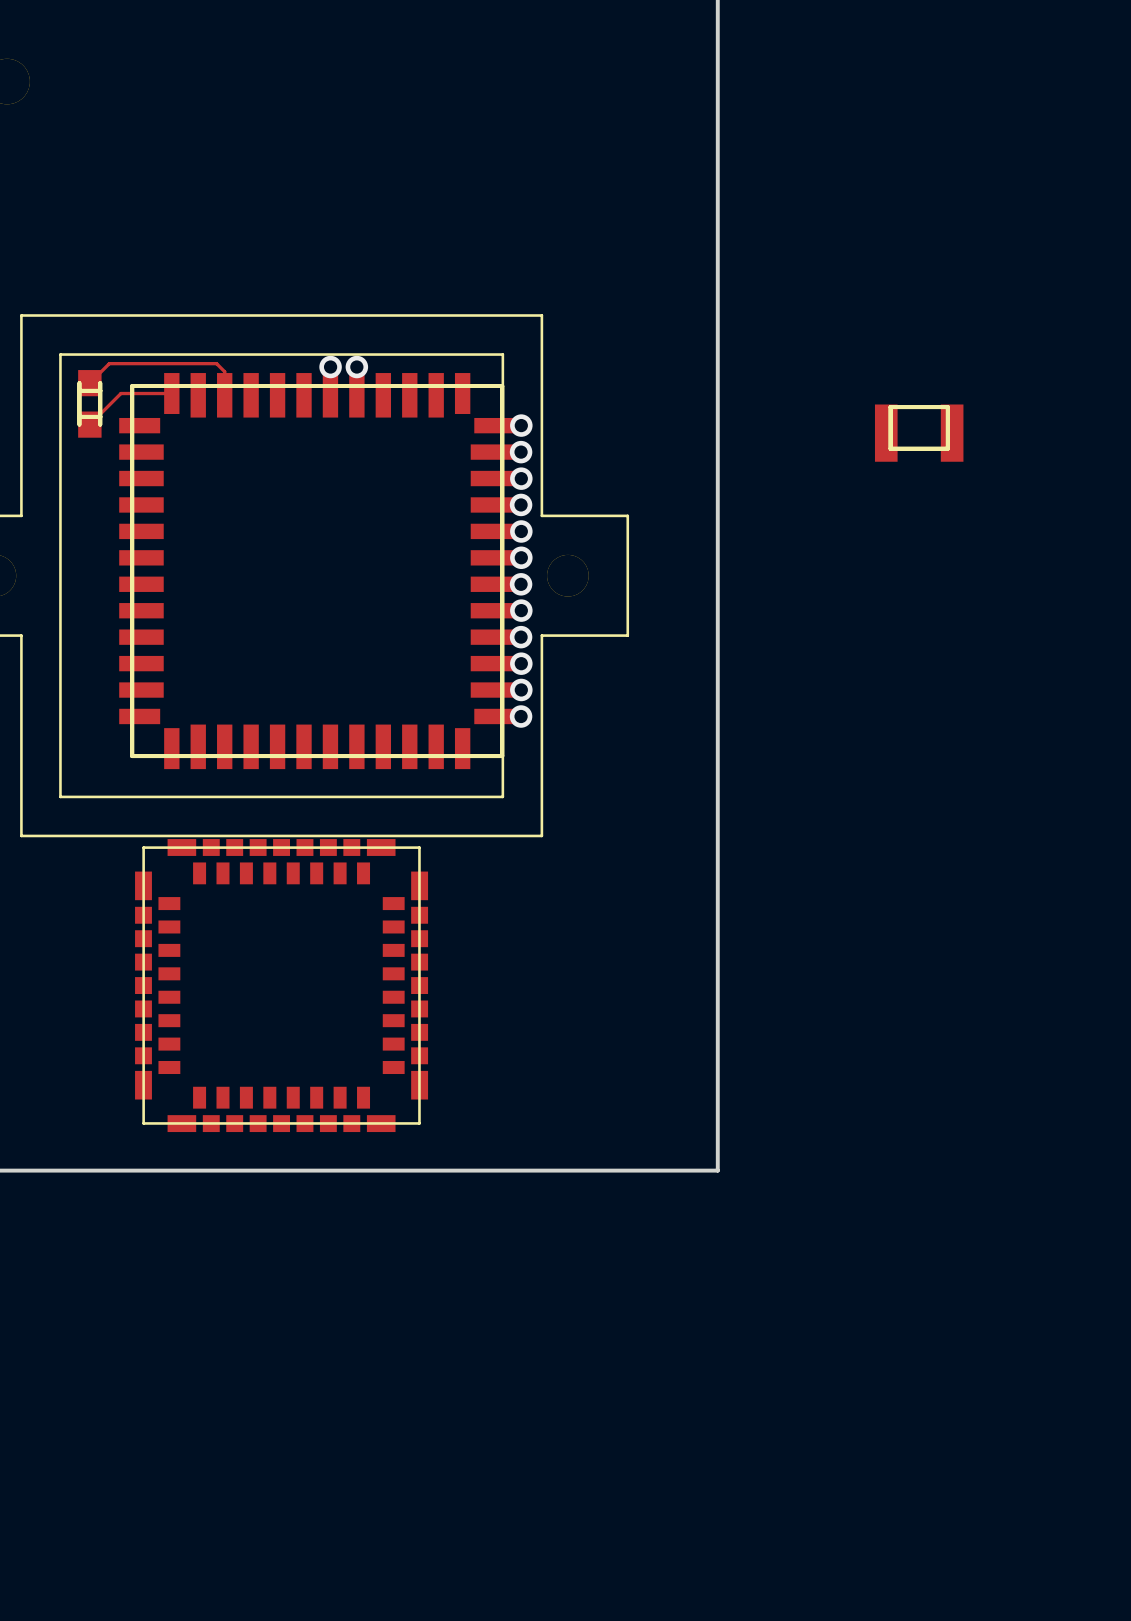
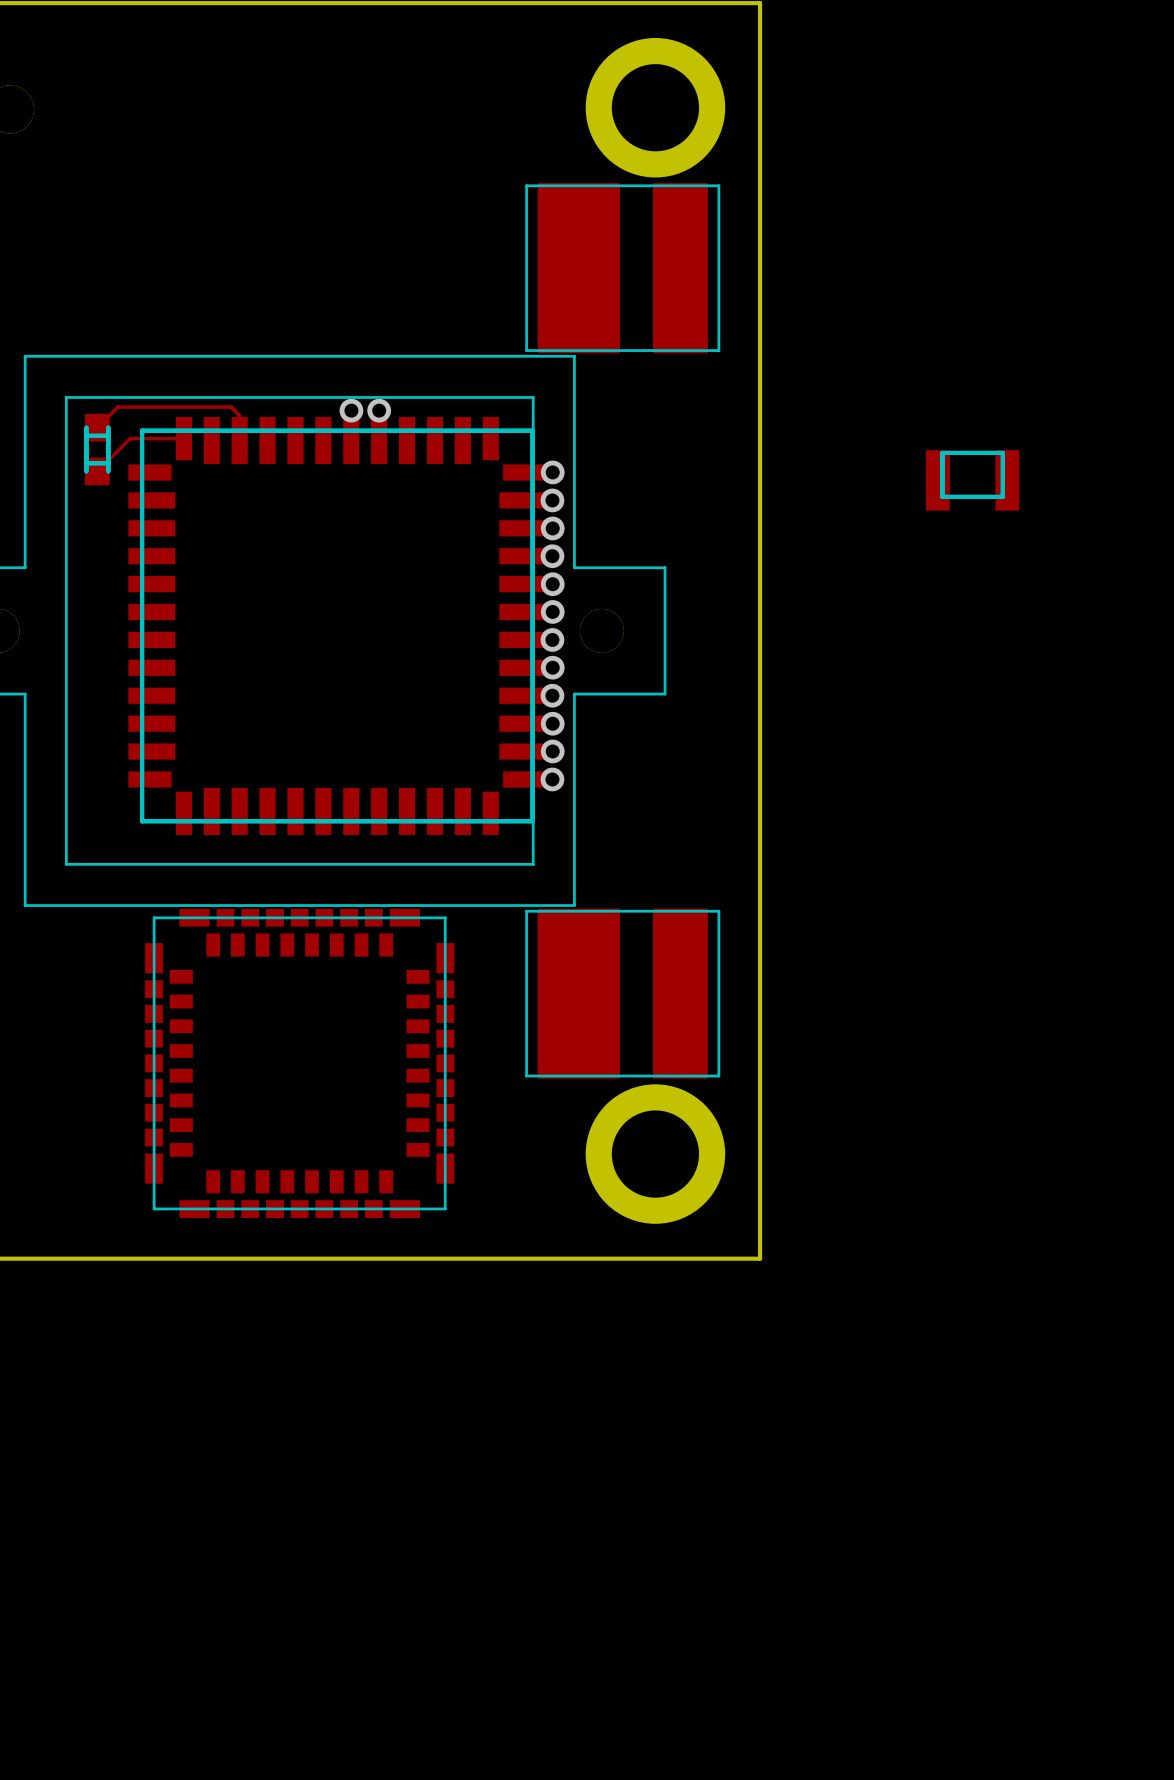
part: none -> (655, 107)
part: none -> (622, 268)
part: none -> (622, 993)
part: none -> (655, 1154)

